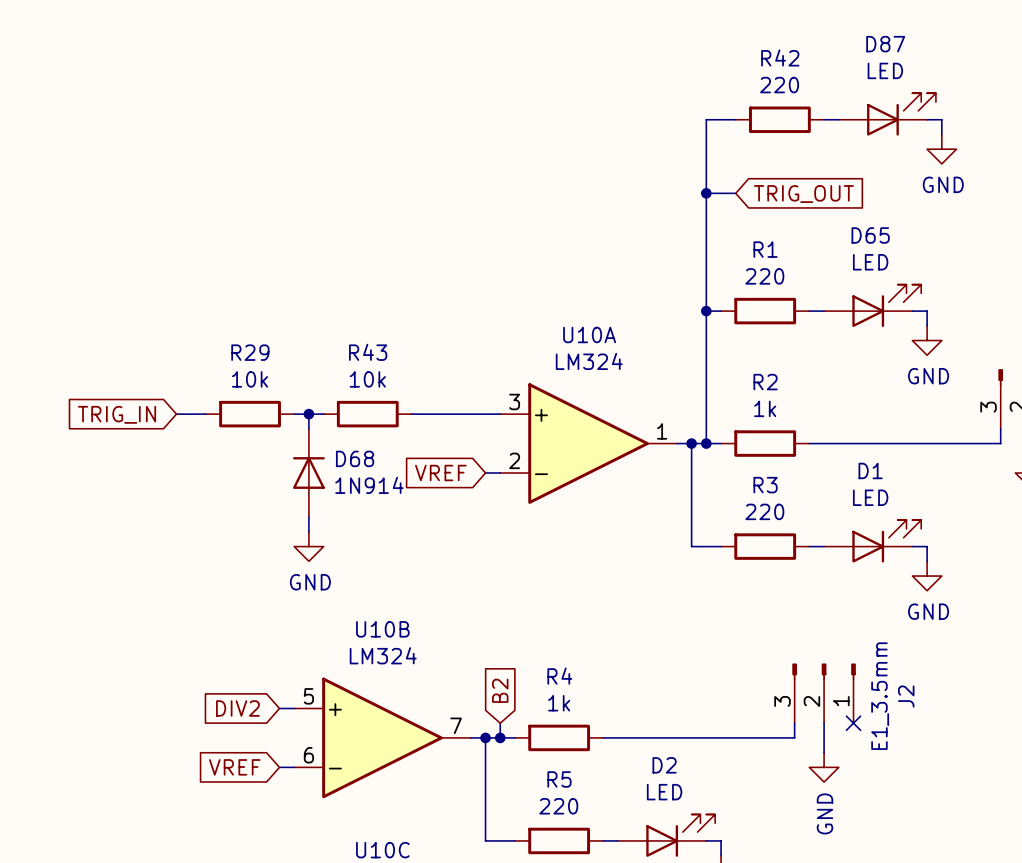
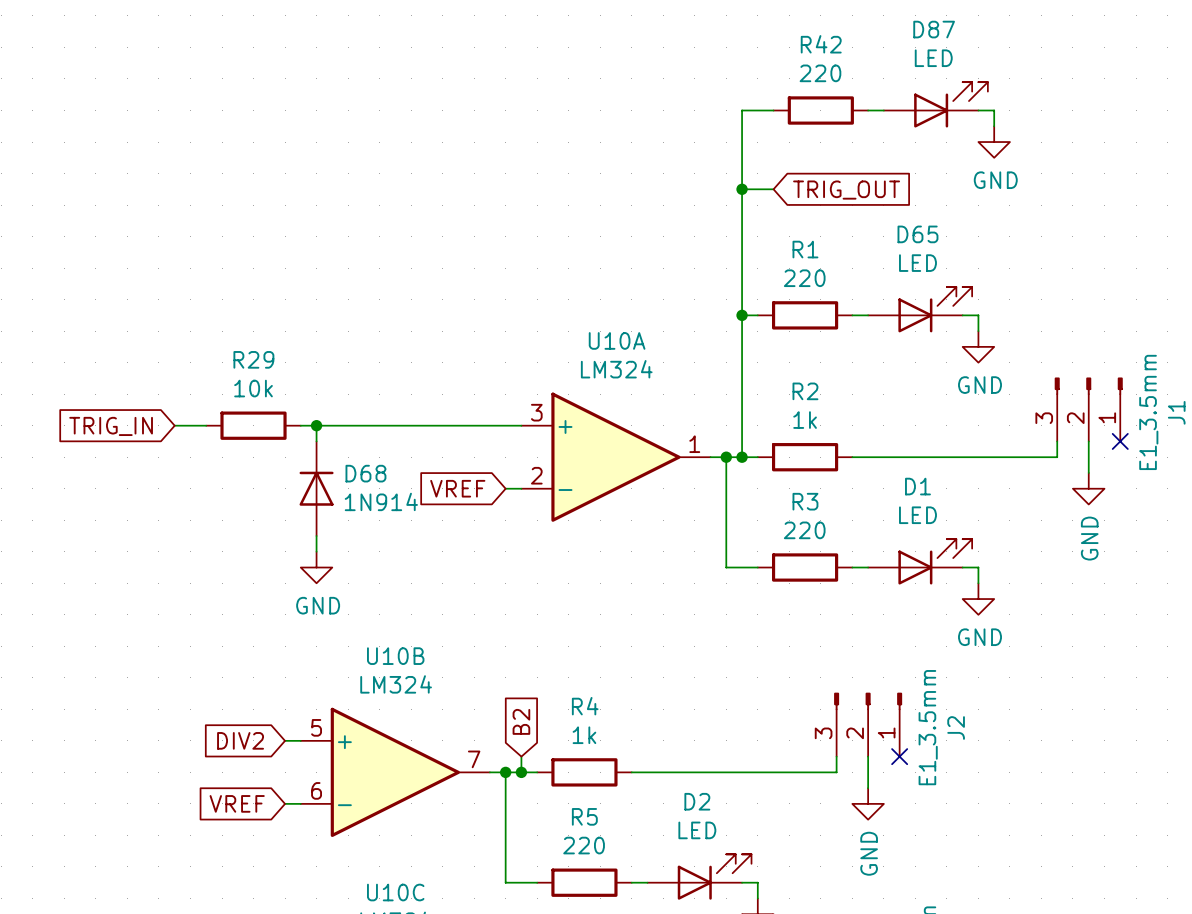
wire: none -> (332, 425) (426, 425)
R43: 10k (367, 414) -> none

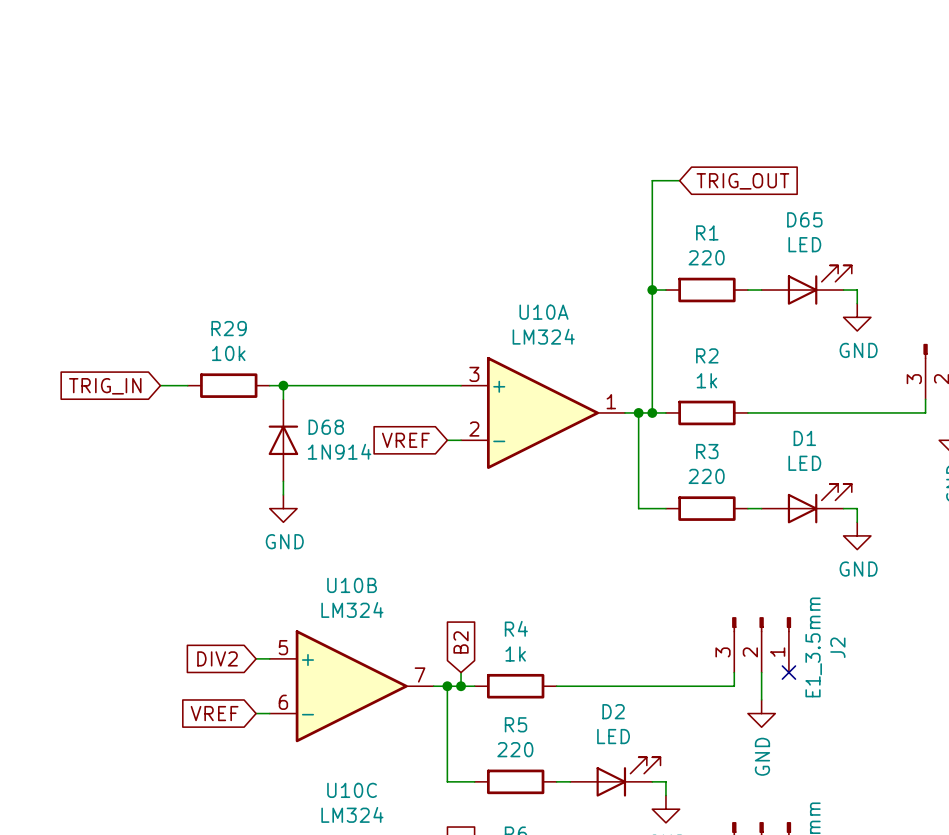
D87: LED (935, 104) -> none
wire: (773, 110) (742, 110) (742, 189) -> none
R42: 220 (820, 110) -> none
wire: (868, 110) (883, 110) -> none
wire: (978, 110) (994, 110) (994, 126) -> none
power symbol: GND (994, 142) -> none
junction: (742, 189) -> none

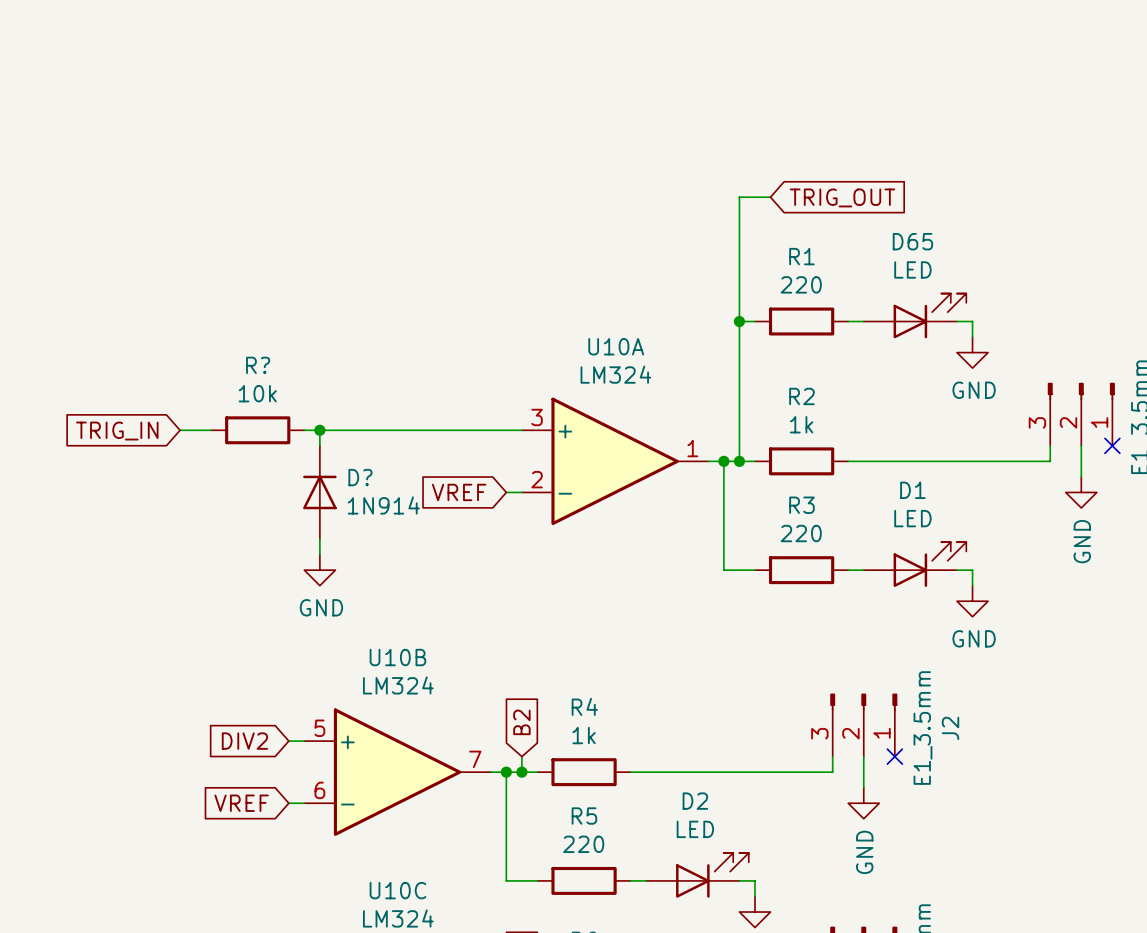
R29 name: R29 (229, 328) -> R? (258, 365)
D68 name: D68 (326, 427) -> D? (360, 477)

